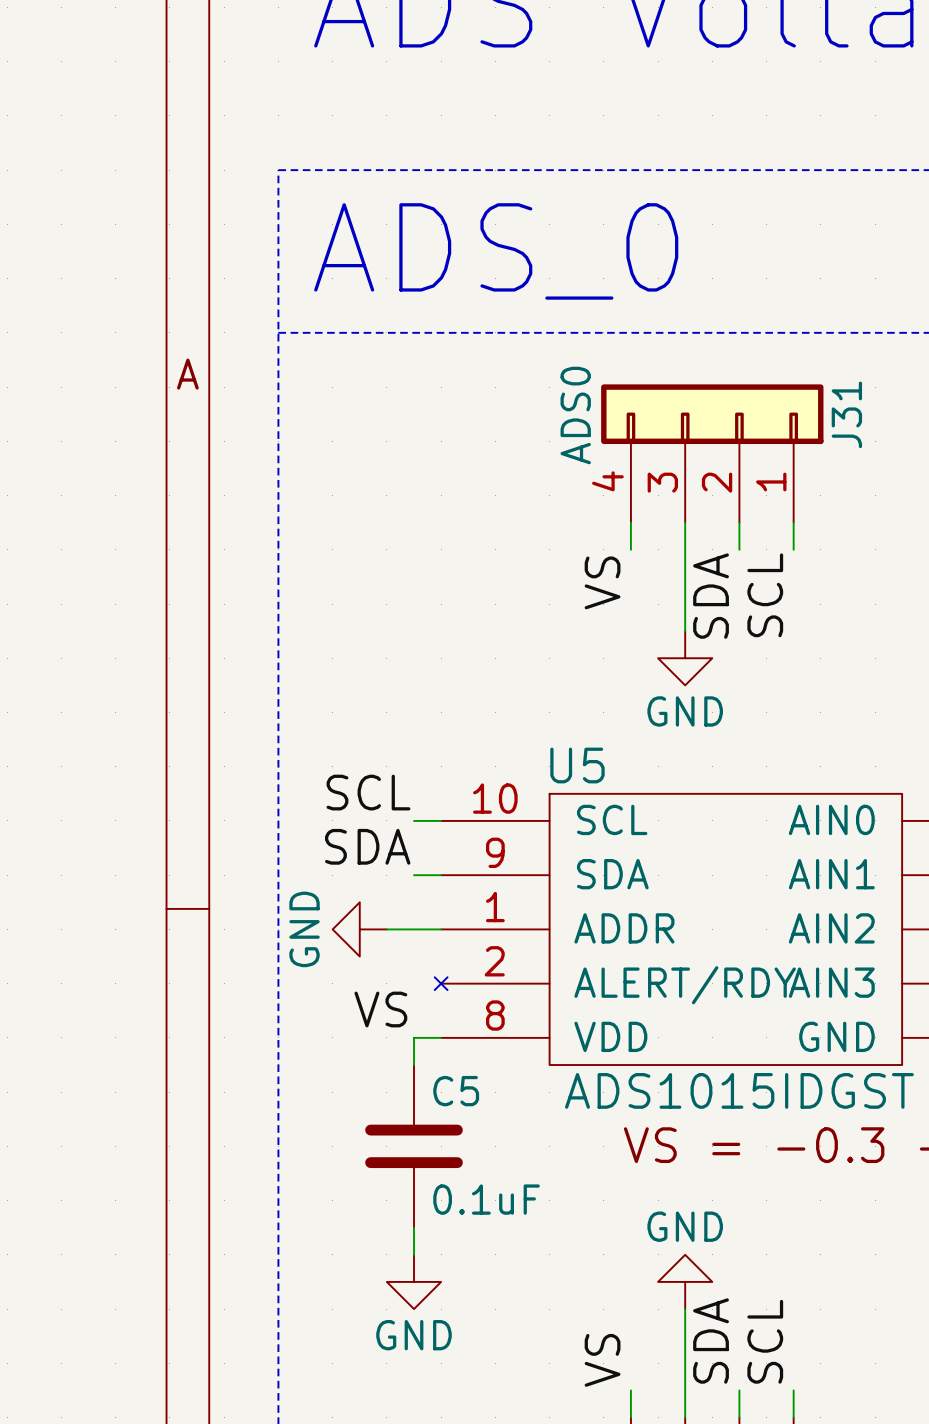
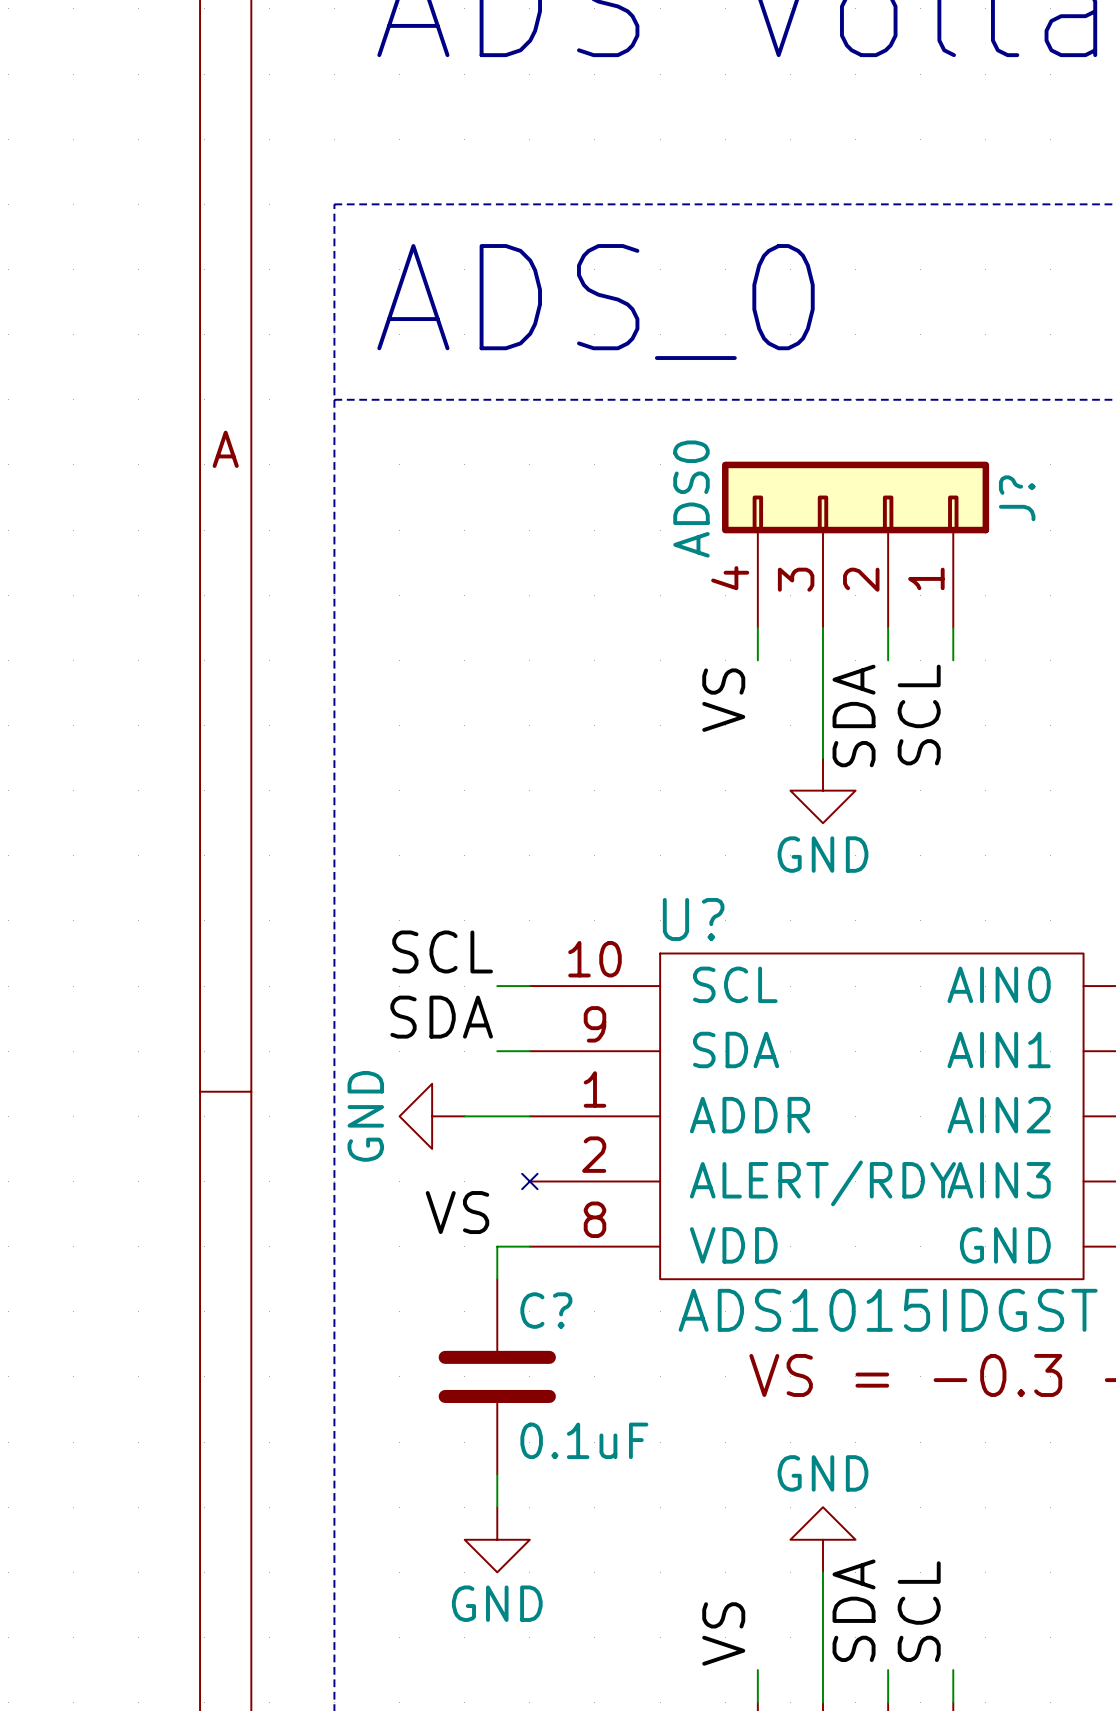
J31 name: J31 (846, 414) -> J? (1017, 498)
U5 name: U5 (577, 765) -> U? (693, 919)
C5 name: C5 (456, 1091) -> C? (546, 1310)

